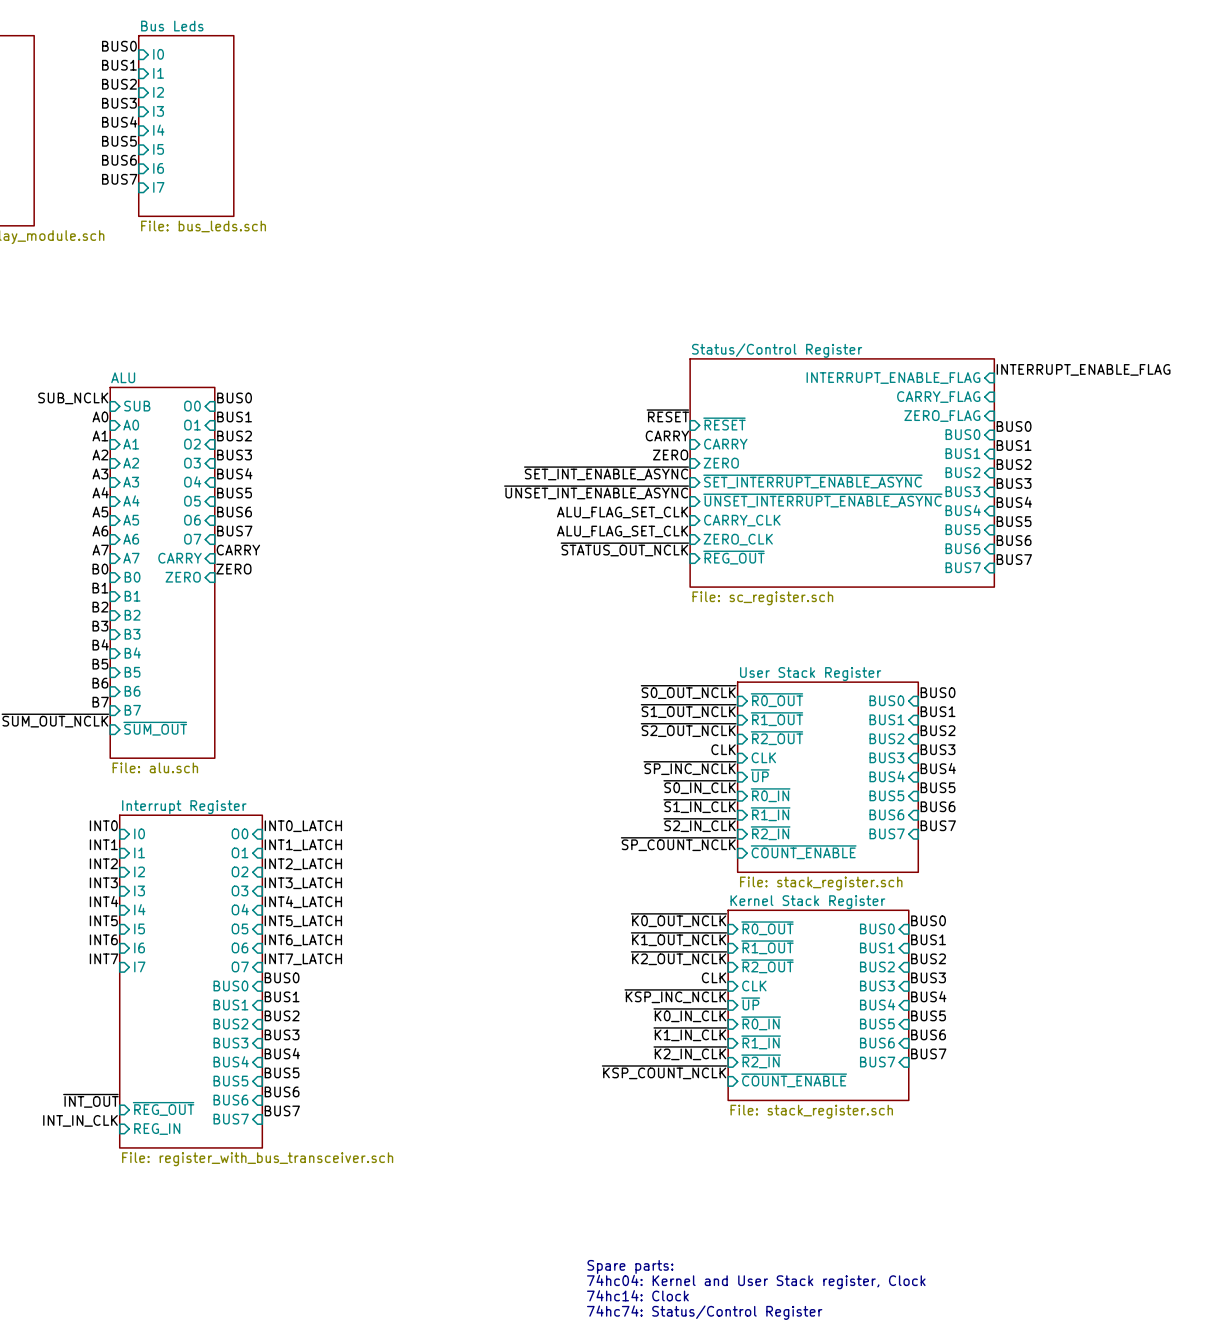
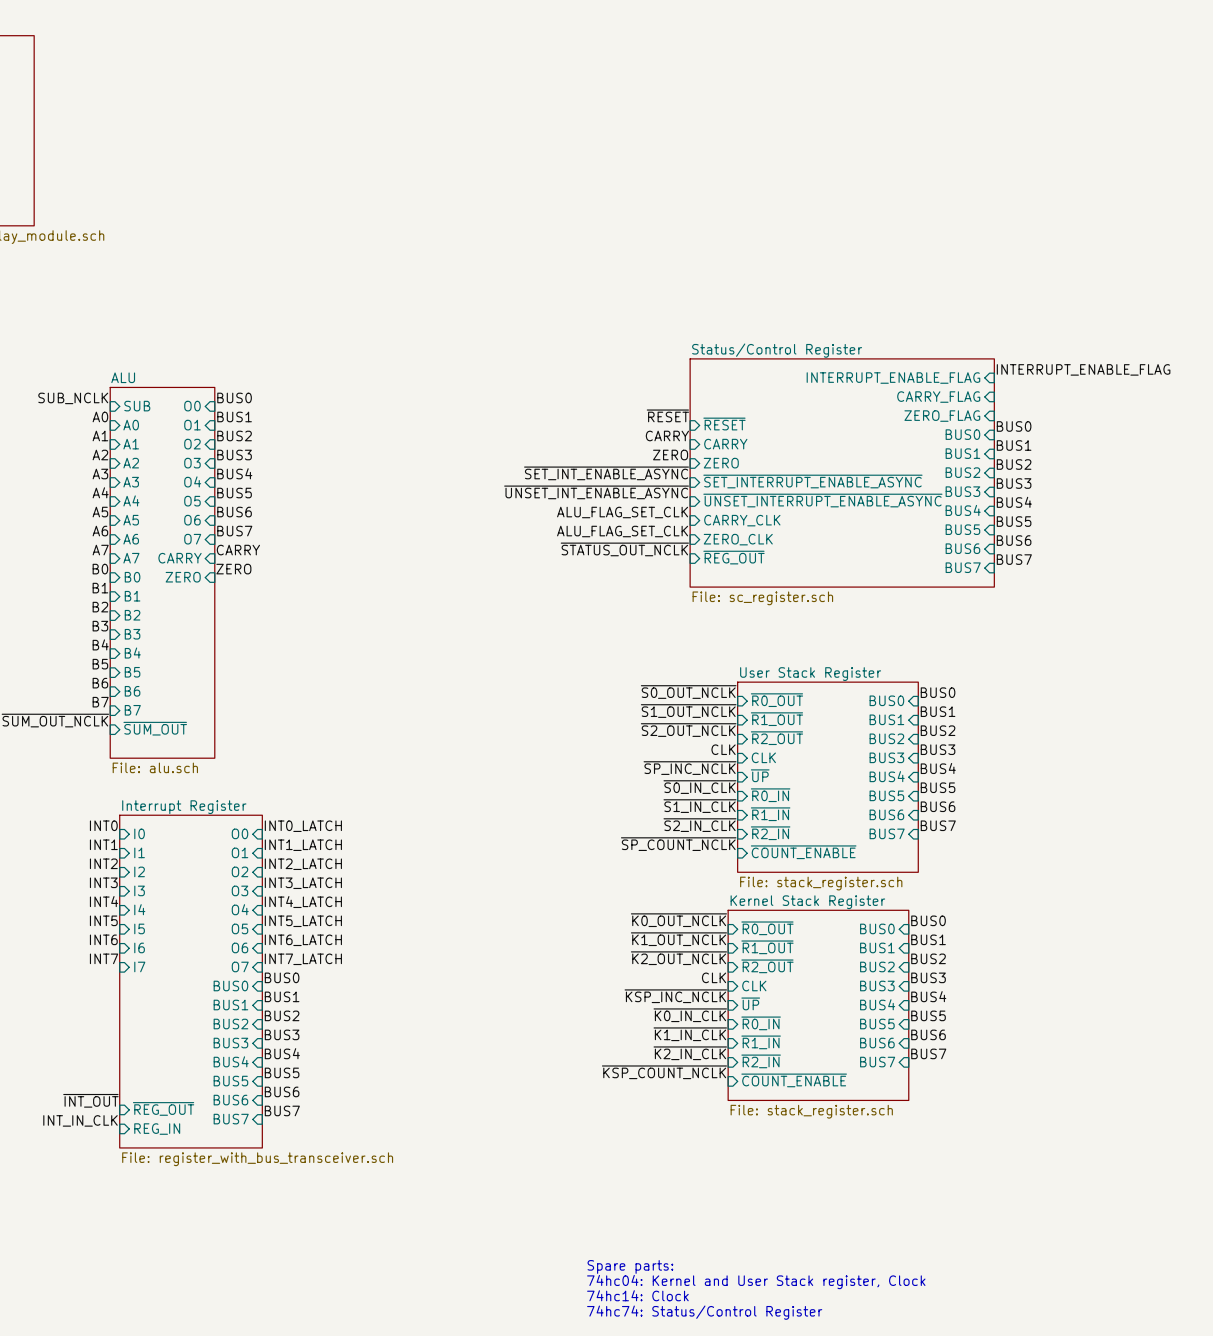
label: BUS0 (119, 46) -> none
sheet pin: I0 (158, 54) -> none
label: BUS1 (119, 65) -> none
sheet pin: I1 (158, 73) -> none
label: BUS2 (119, 84) -> none
sheet pin: I2 (158, 92) -> none
label: BUS3 (119, 103) -> none
sheet pin: I3 (158, 111) -> none
label: BUS4 (119, 122) -> none
sheet Bus Leds: File: bus_leds.sch (186, 126) -> none
sheet pin: I4 (158, 130) -> none
label: BUS5 (119, 141) -> none
sheet pin: I5 (158, 149) -> none
label: BUS6 (119, 160) -> none
sheet pin: I6 (158, 168) -> none
label: BUS7 (119, 179) -> none
sheet pin: I7 (158, 187) -> none

